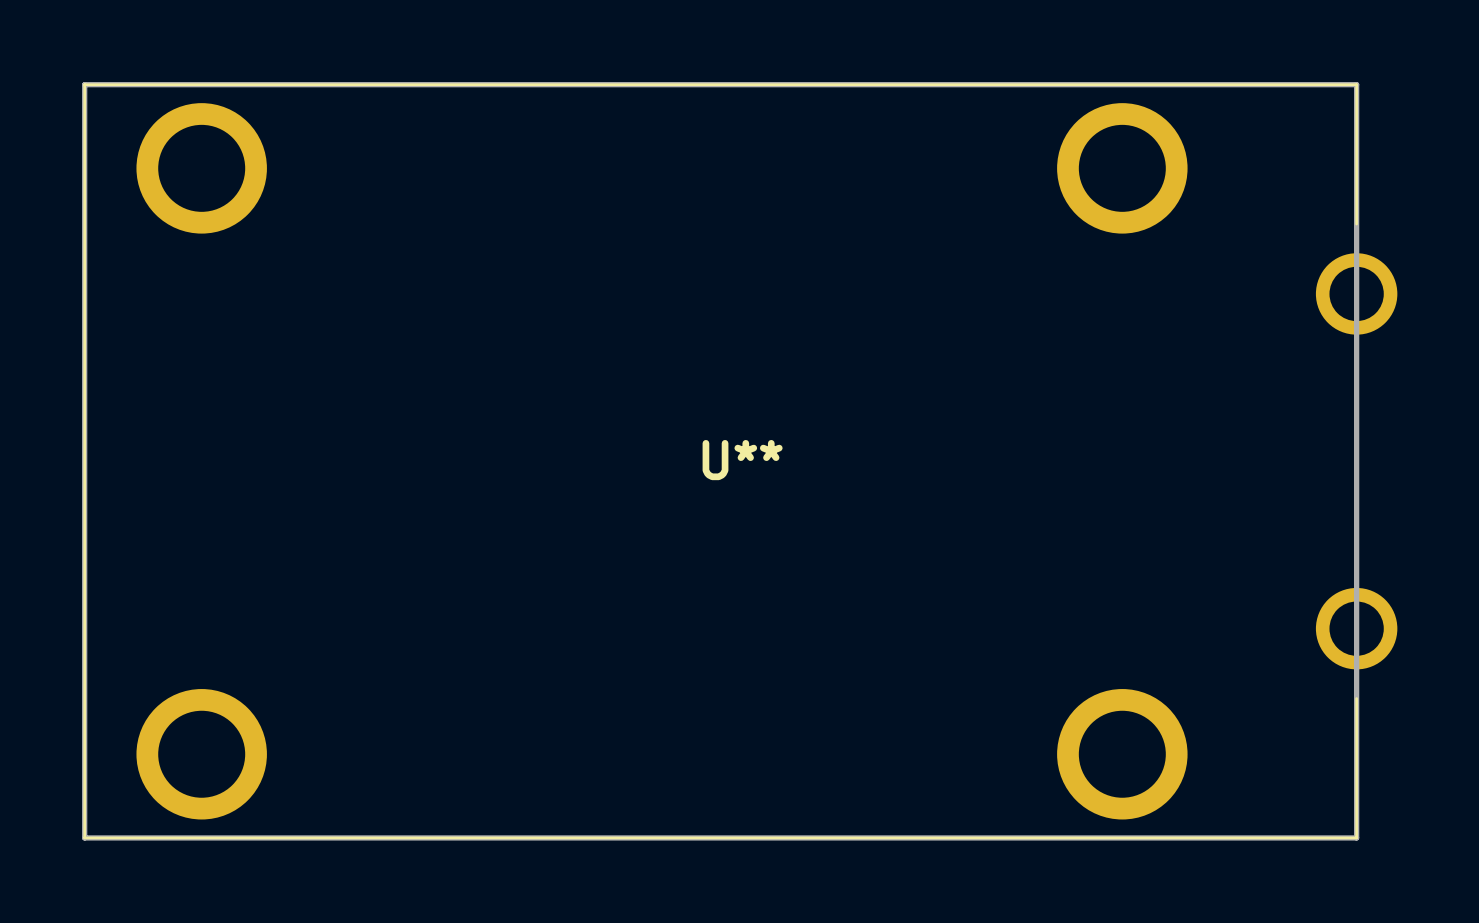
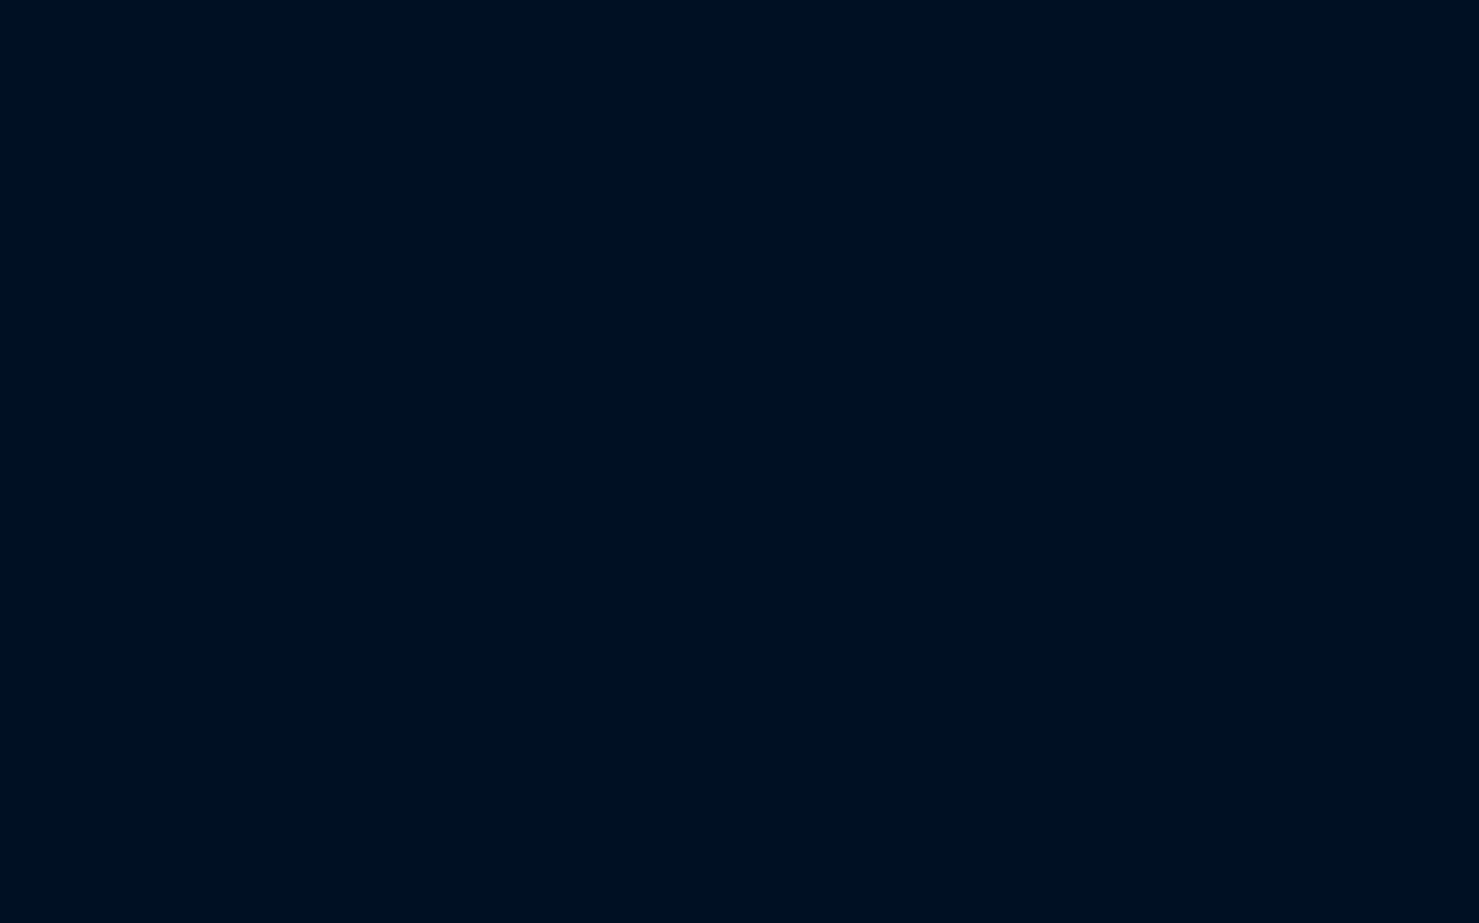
U**: (739, 461) -> none

